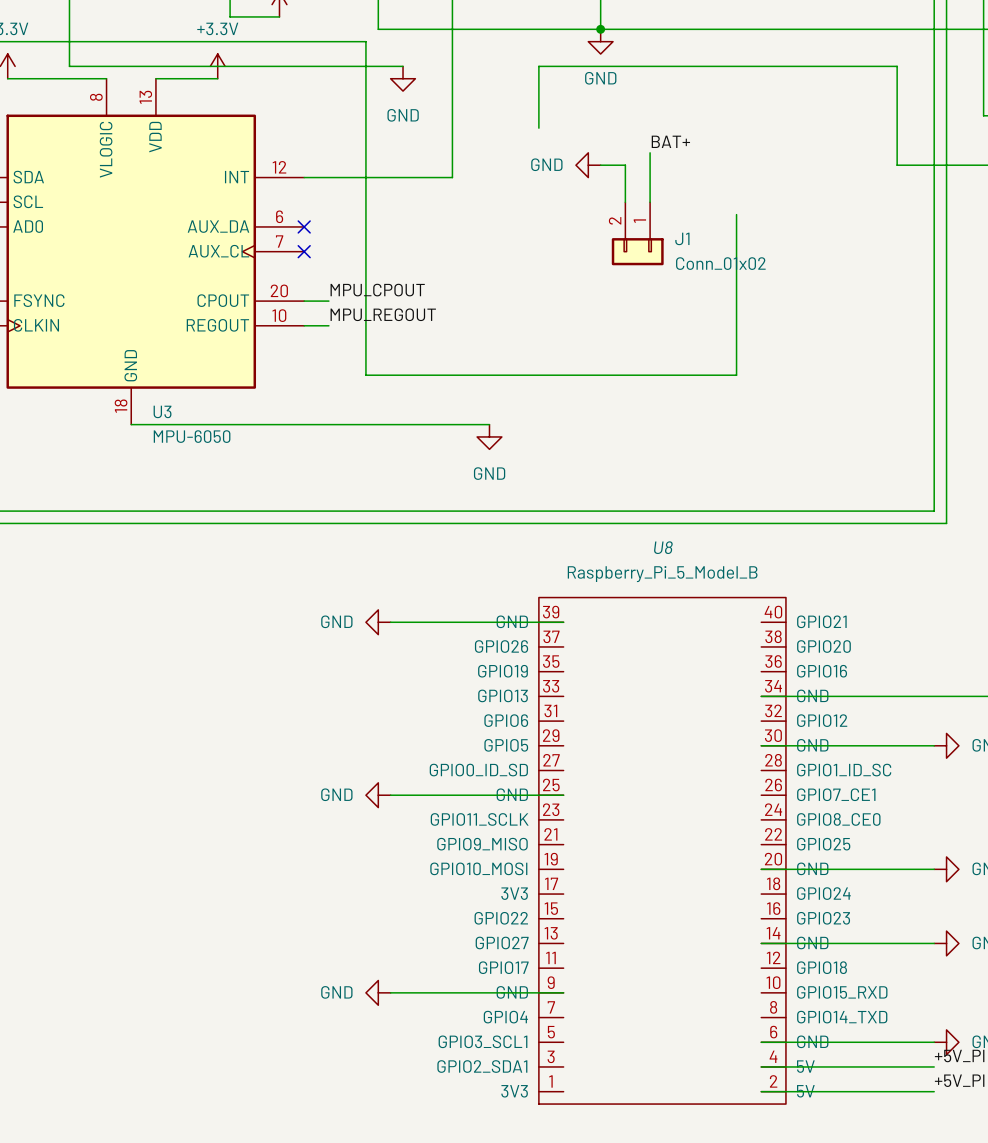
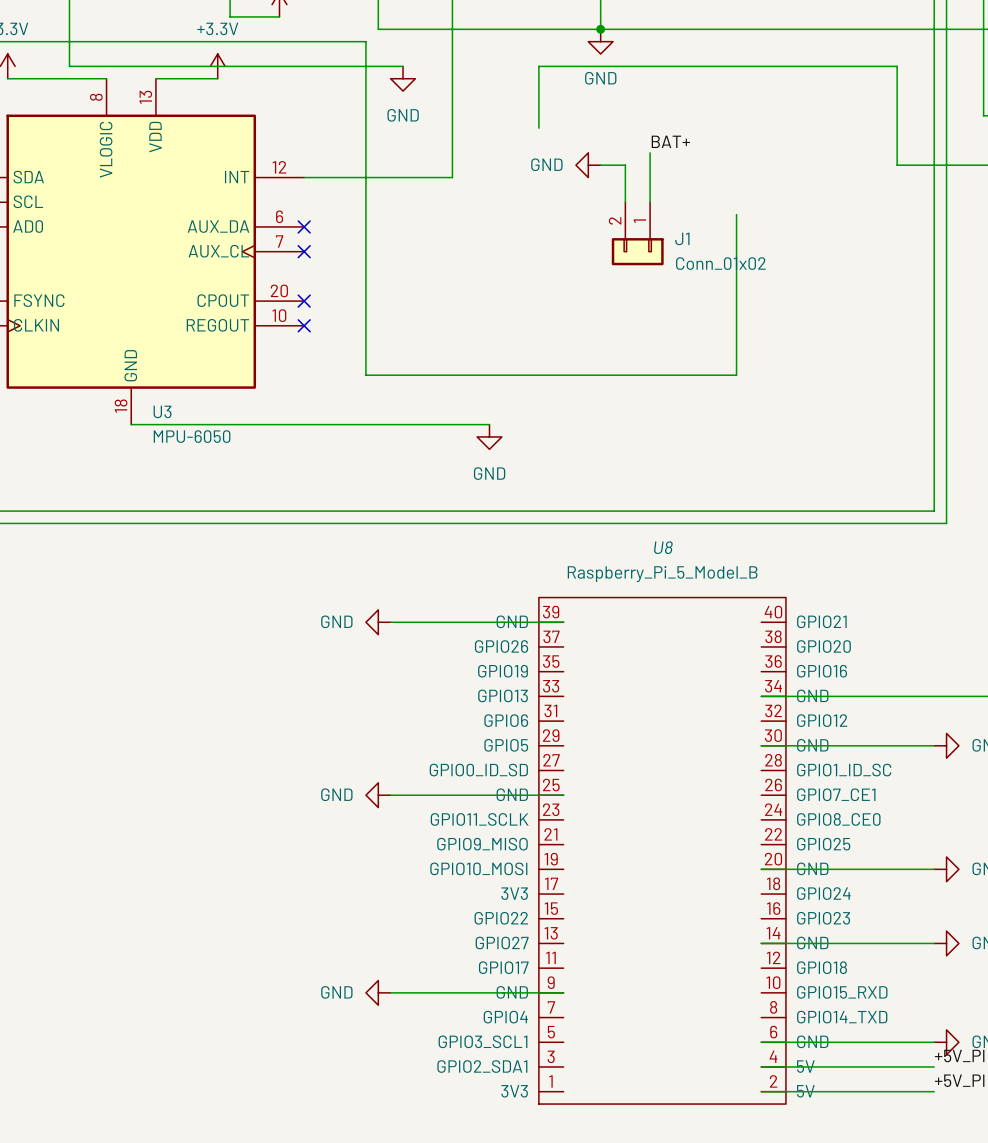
label: MPU_CPOUT (377, 290) -> none
wire: (304, 301) (328, 301) -> none
no-connect mark: none -> (304, 301)
label: MPU_REGOUT (383, 314) -> none
wire: (304, 325) (328, 325) -> none
no-connect mark: none -> (304, 325)

